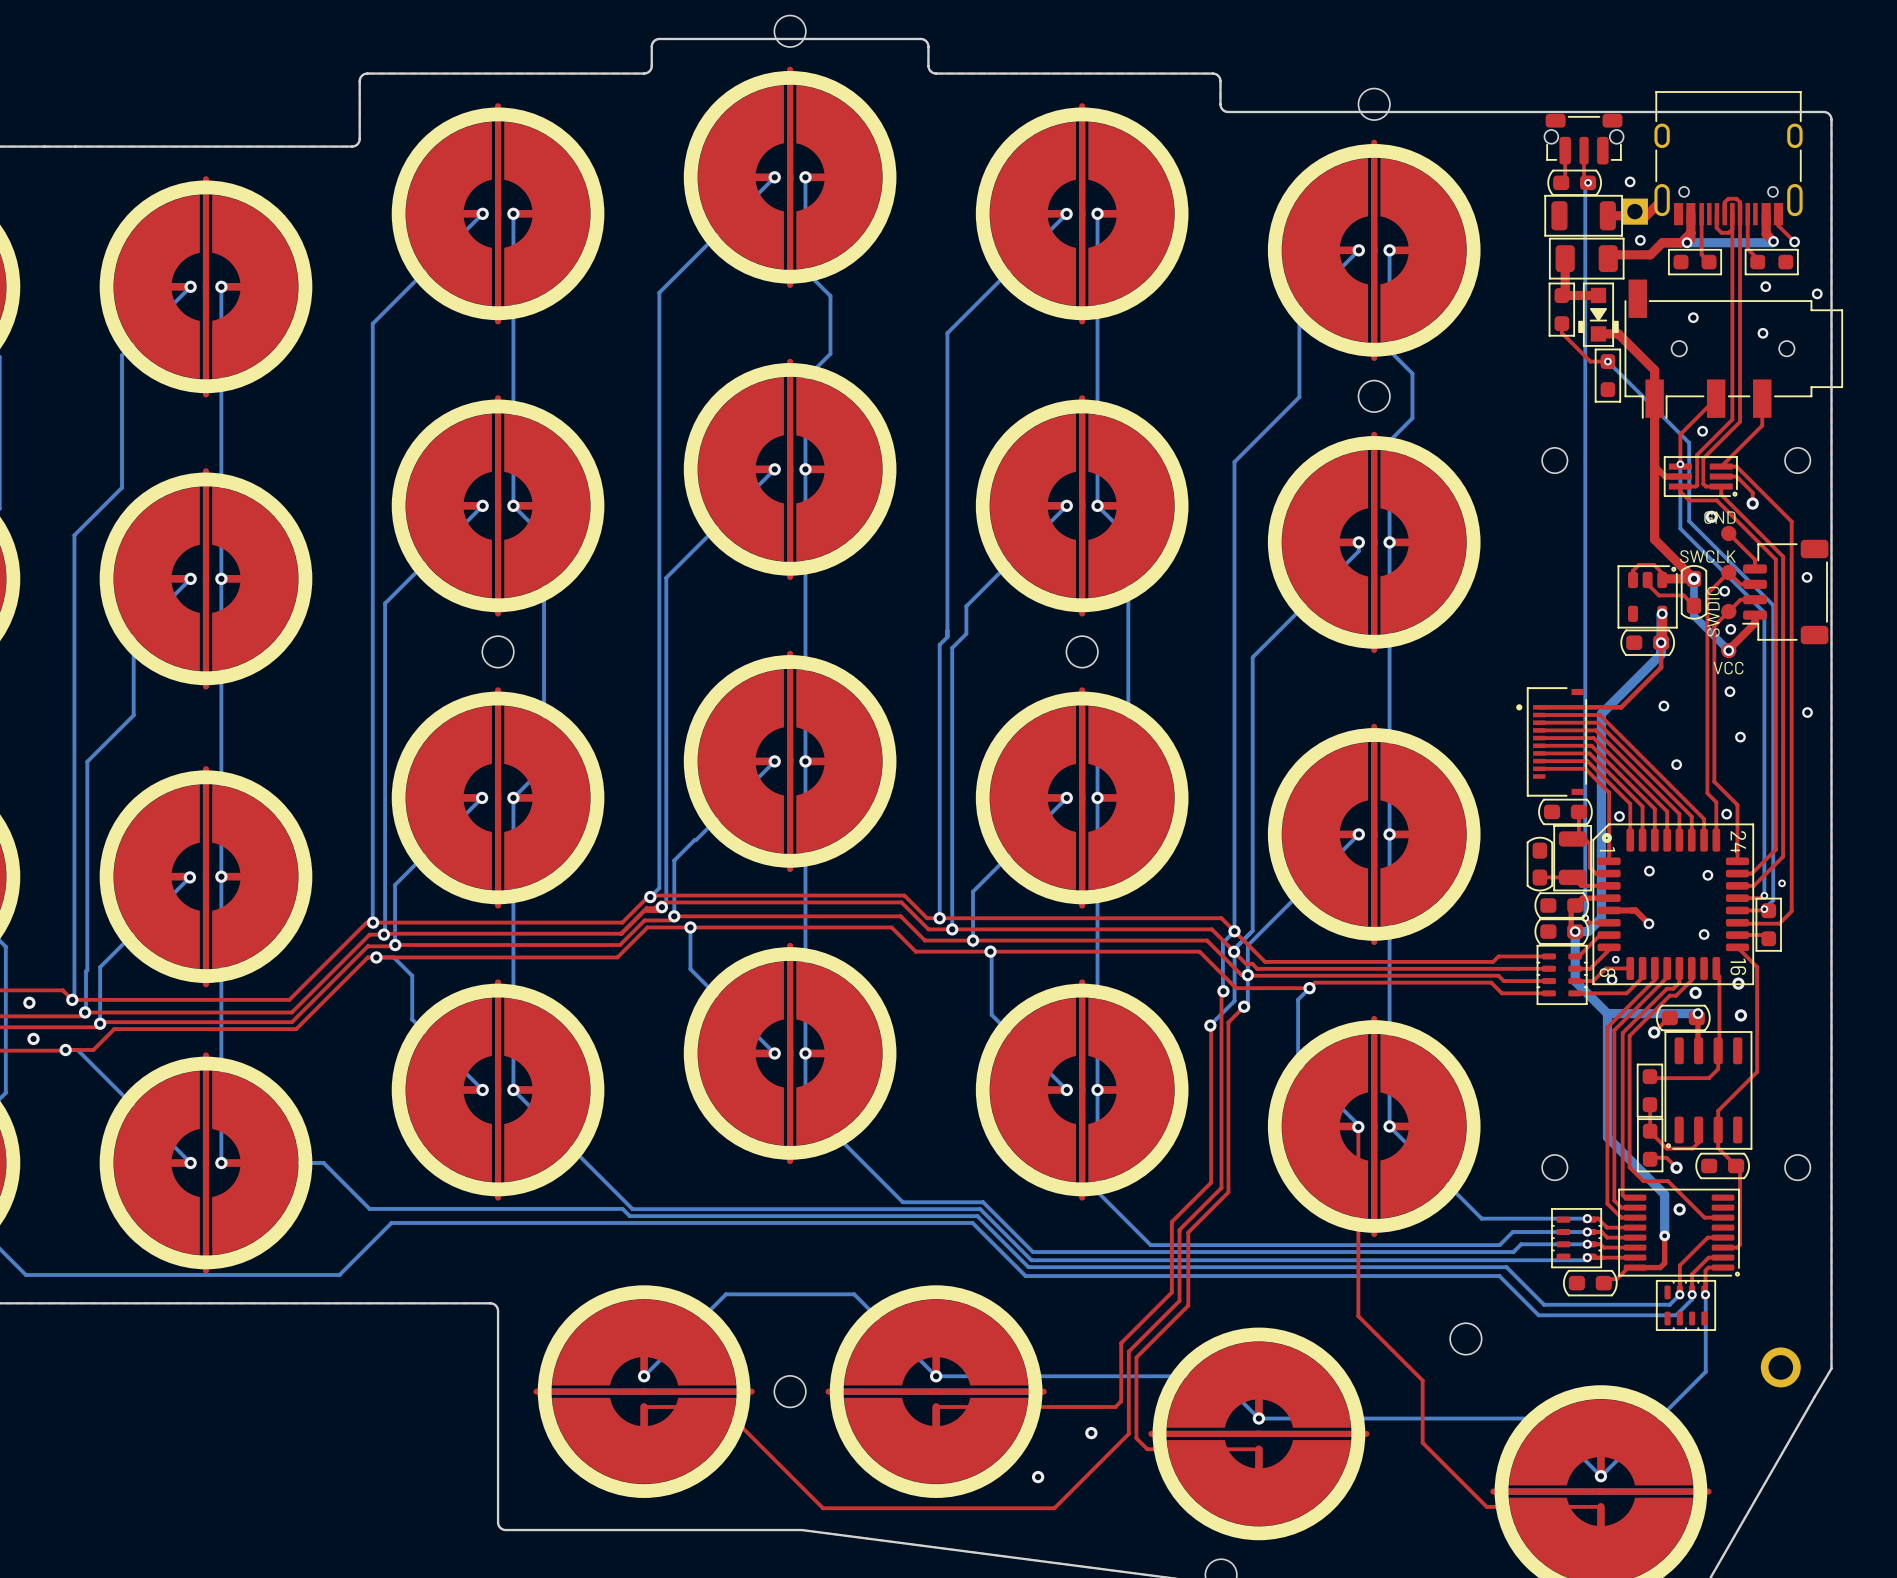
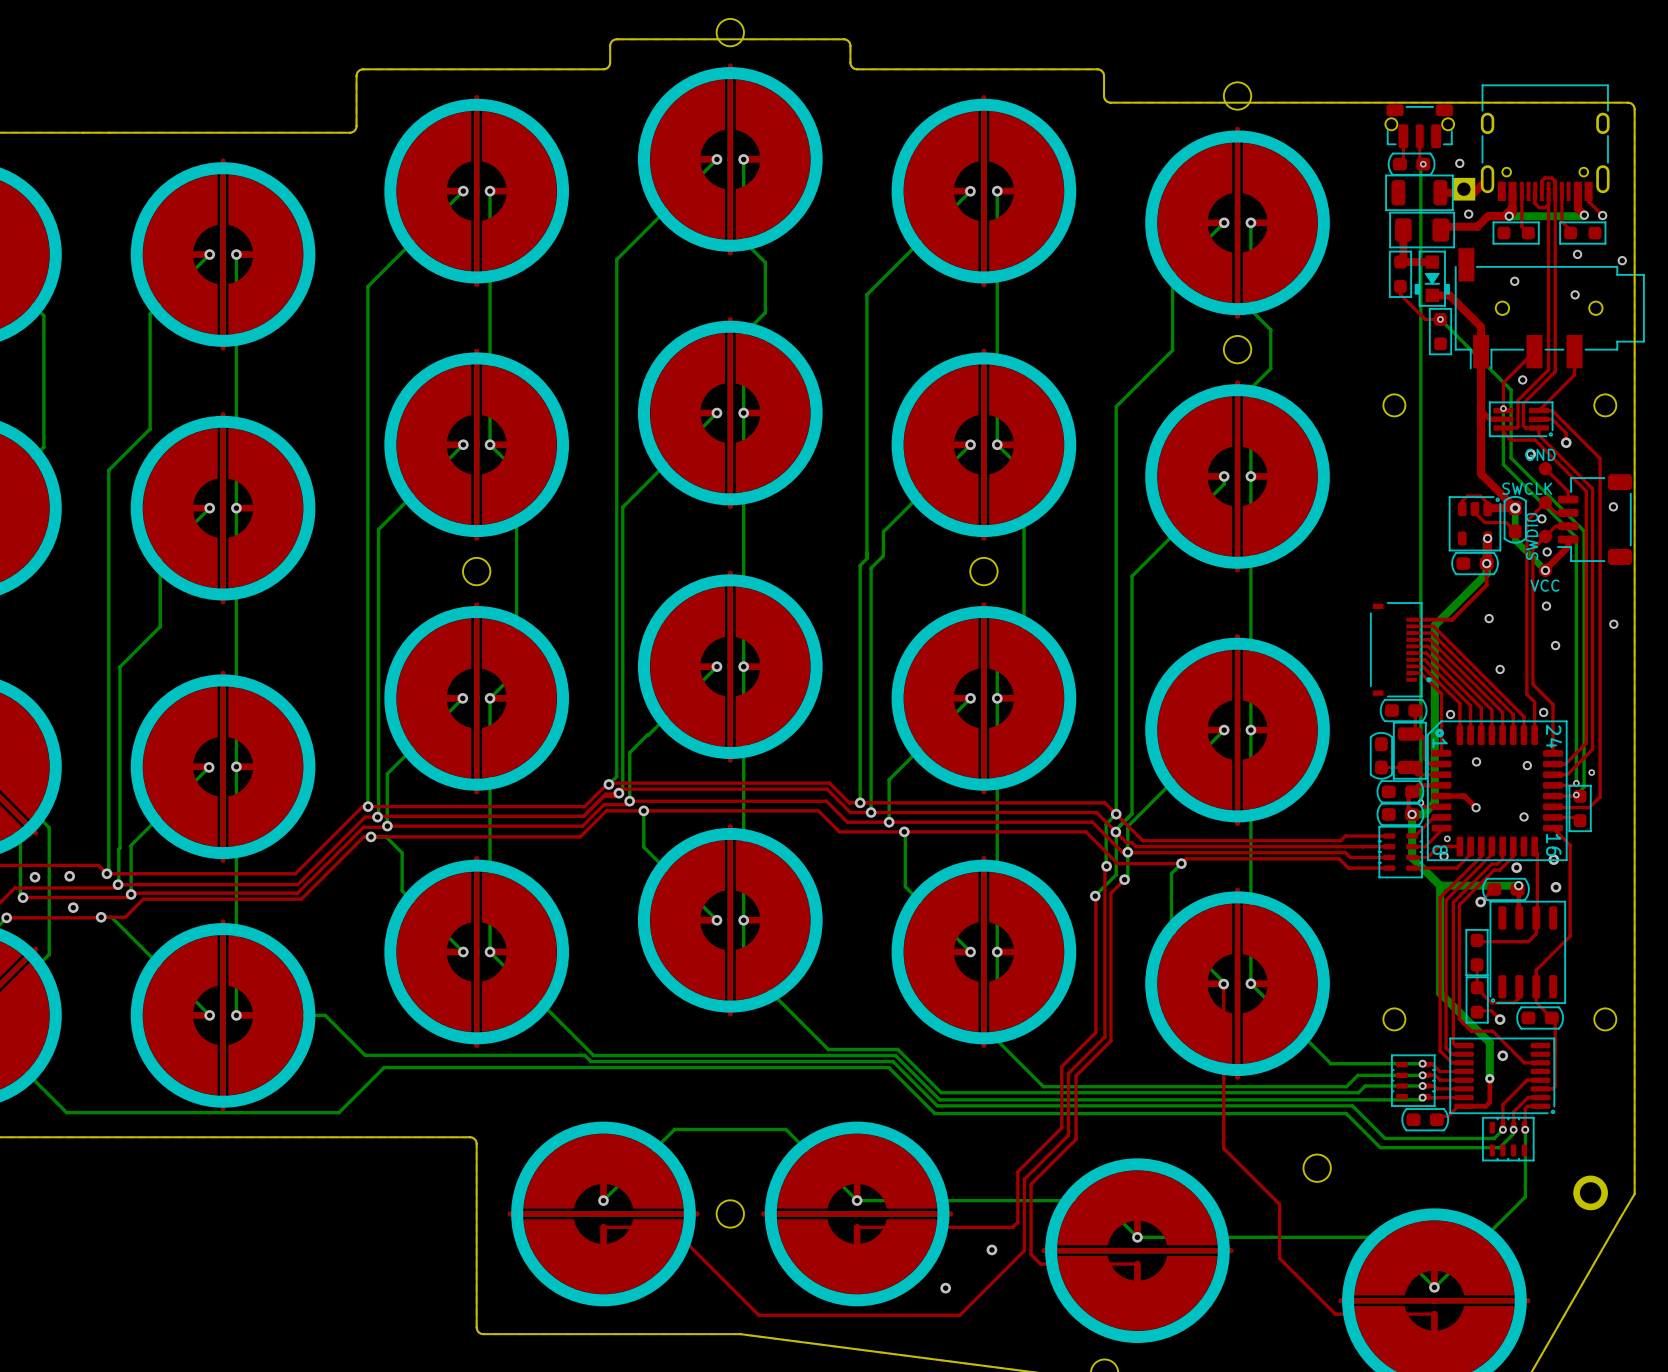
top track: (1539, 707) (1574, 707) -> none
top track: (1539, 715) (1574, 715) -> none
top track: (1539, 722) (1574, 722) -> none
top track: (1539, 730) (1574, 730) -> none
top track: (1539, 738) (1574, 738) -> none
part rotation: 0° (1551, 741) -> 180° (1400, 649)
top track: (1539, 745) (1574, 745) -> none
top track: (1539, 753) (1574, 753) -> none
top track: (1539, 761) (1574, 761) -> none
top track: (1539, 768) (1574, 768) -> none

